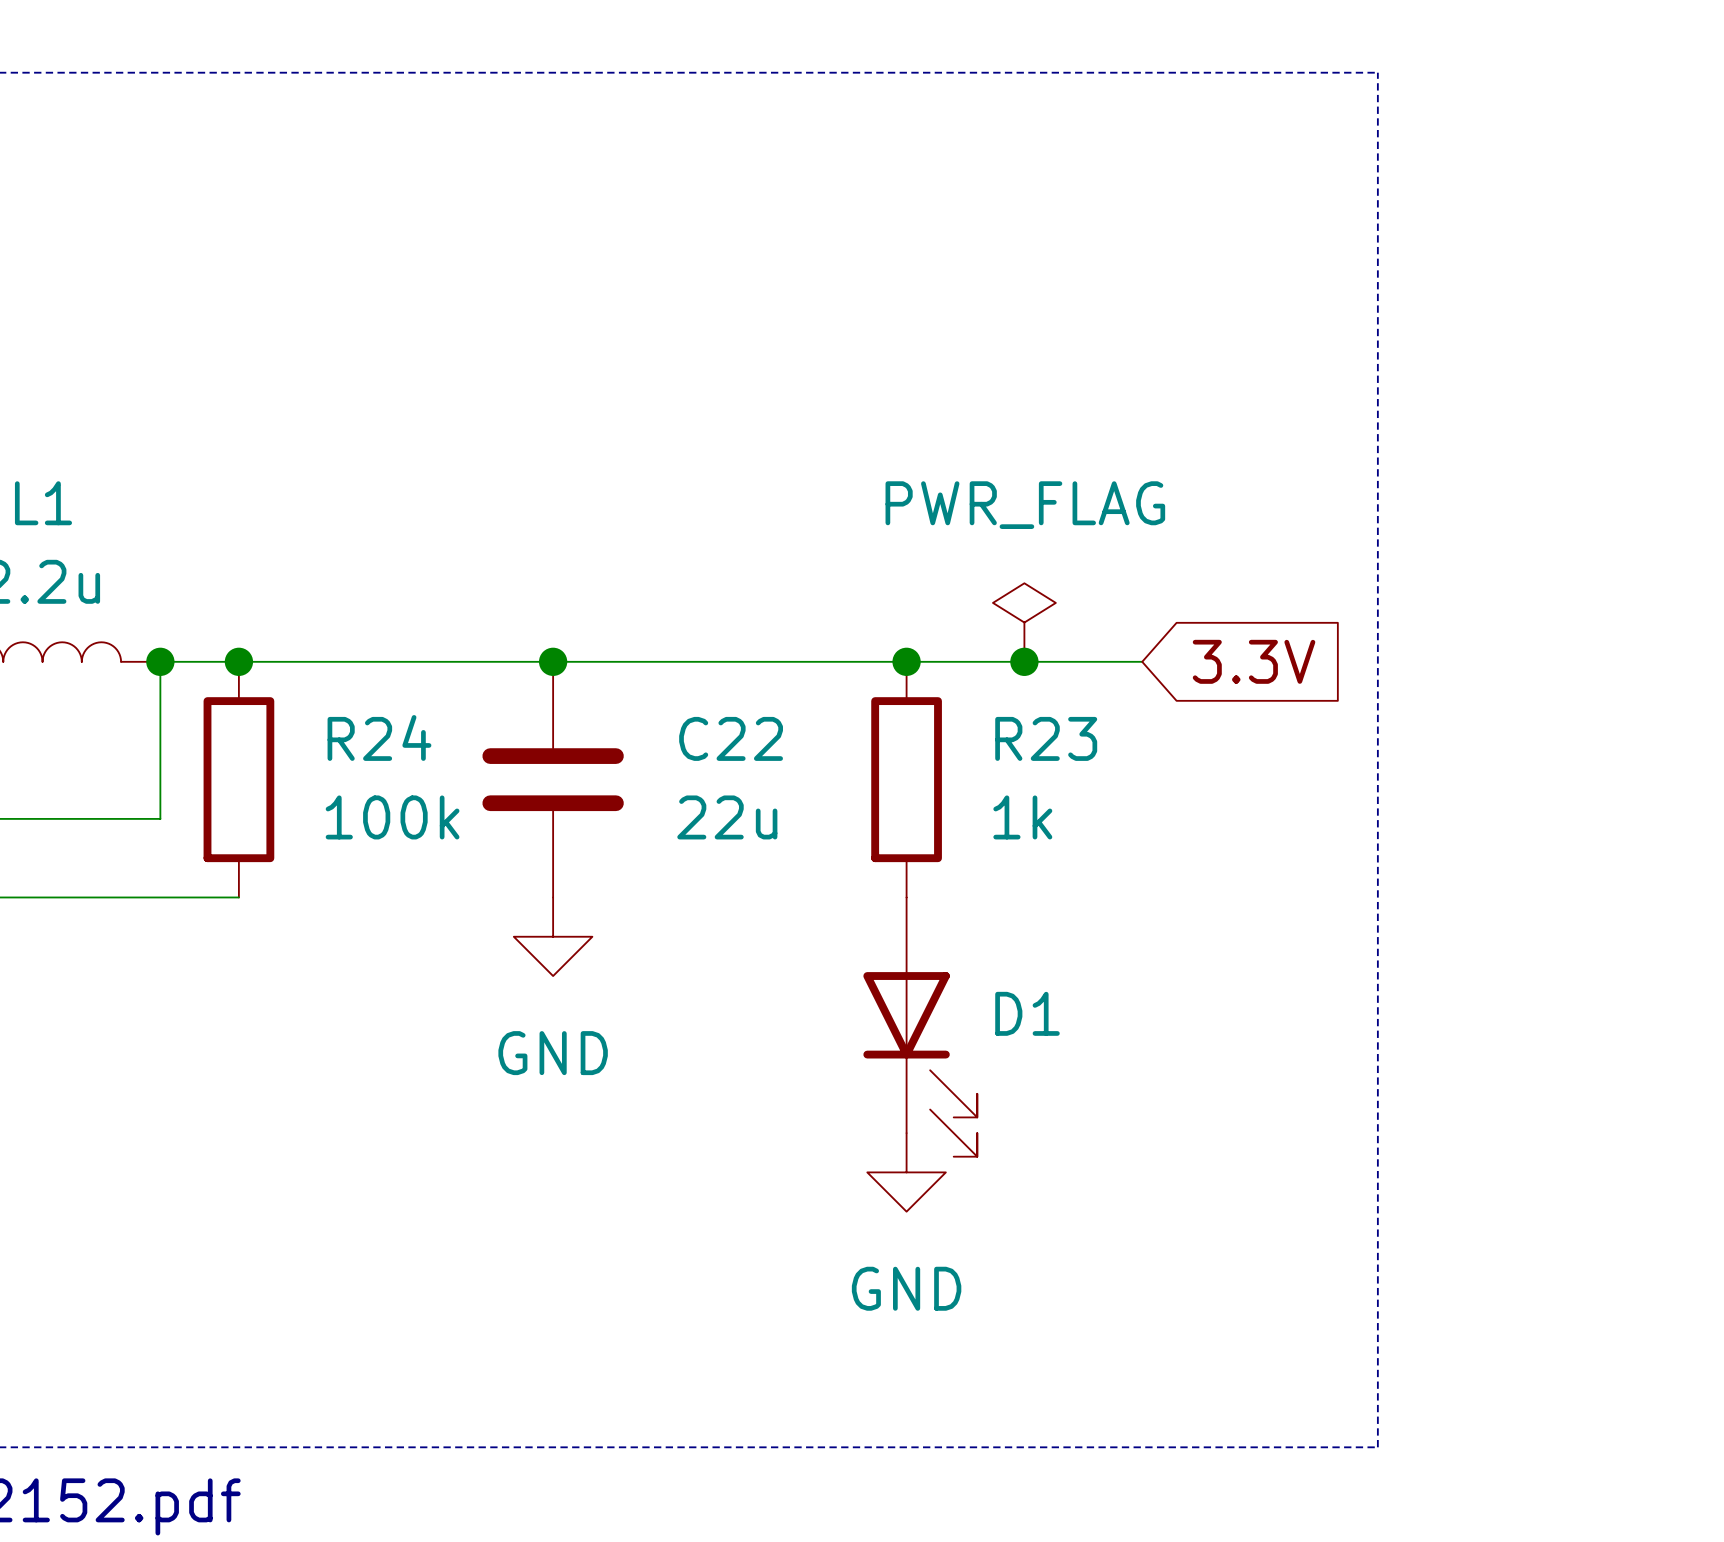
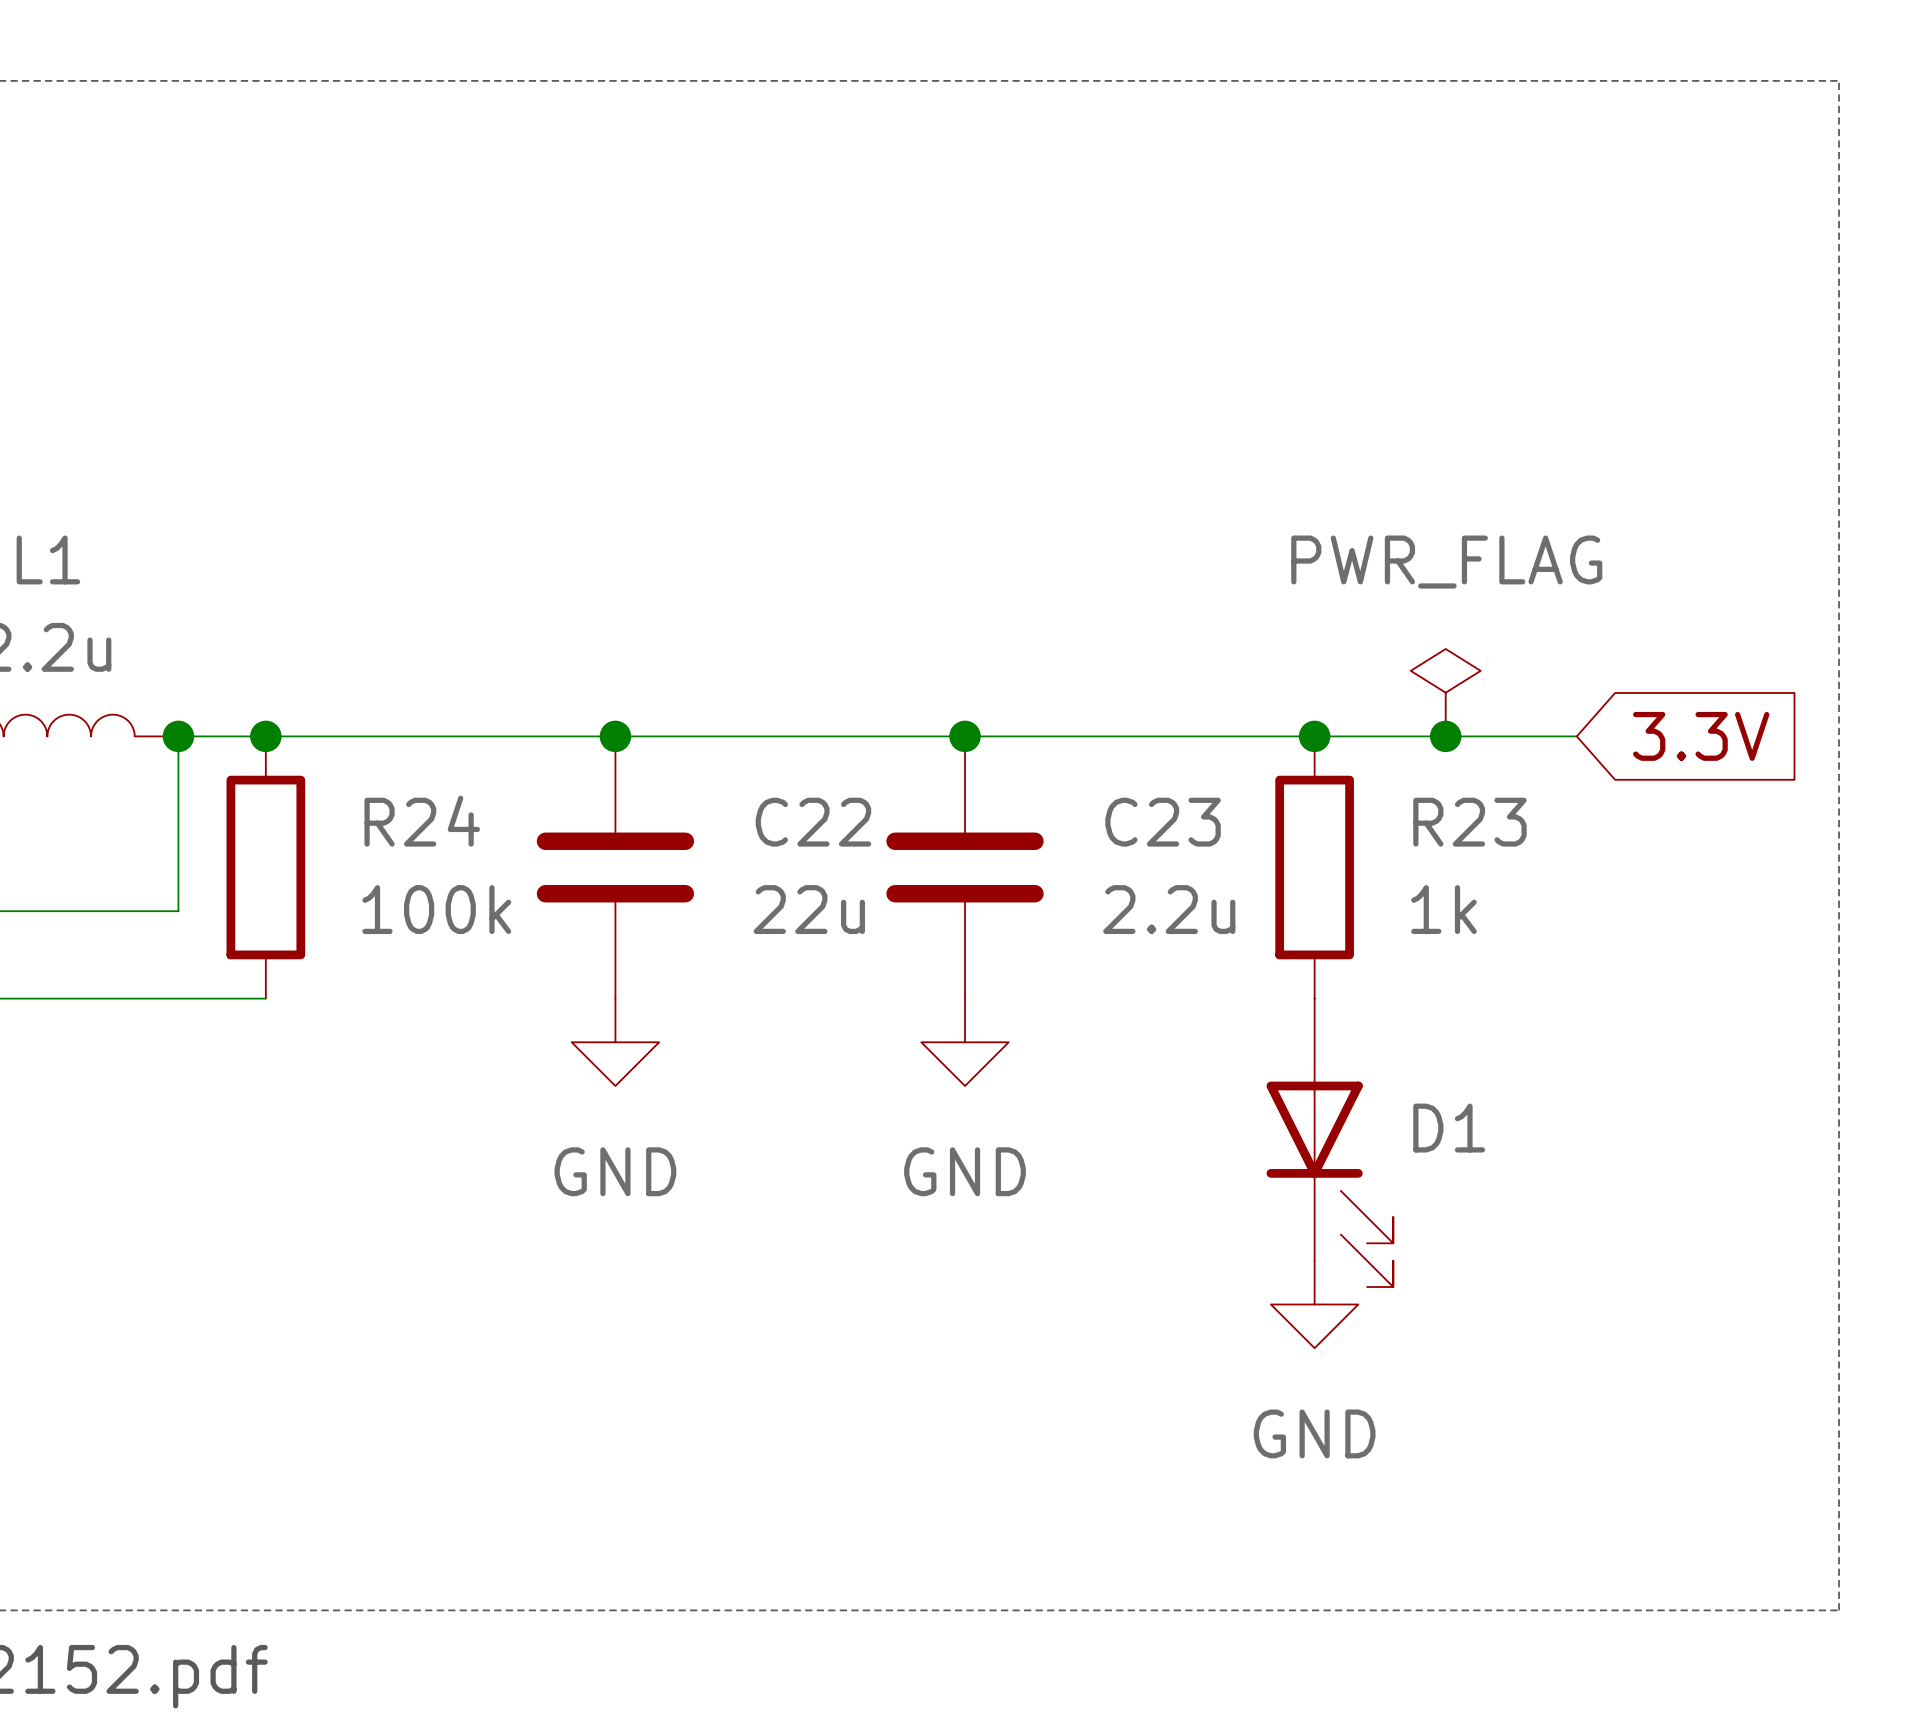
line: (1377, 72) (1377, 1447) -> (1533, 80) (1839, 80) (1839, 1610) (1533, 1610)
power symbol position: PWR_FLAG (1024, 622) -> PWR_FLAG (1445, 692)
junction position: (906, 661) -> (965, 736)
junction: (1024, 661) -> none
wire: none -> (1270, 736) (1576, 736)
junction: none -> (1314, 736)
global label position: 3.3V (1254, 661) -> 3.3V (1701, 736)
junction: none -> (1445, 736)
C23: none -> 2.2u (965, 867)
R23 position: (906, 779) -> (1314, 867)
power symbol: none -> GND (965, 1042)
D1 position: (920, 1027) -> (1329, 1142)
power symbol: GND (906, 1172) -> none
power symbol: none -> GND (1314, 1304)

